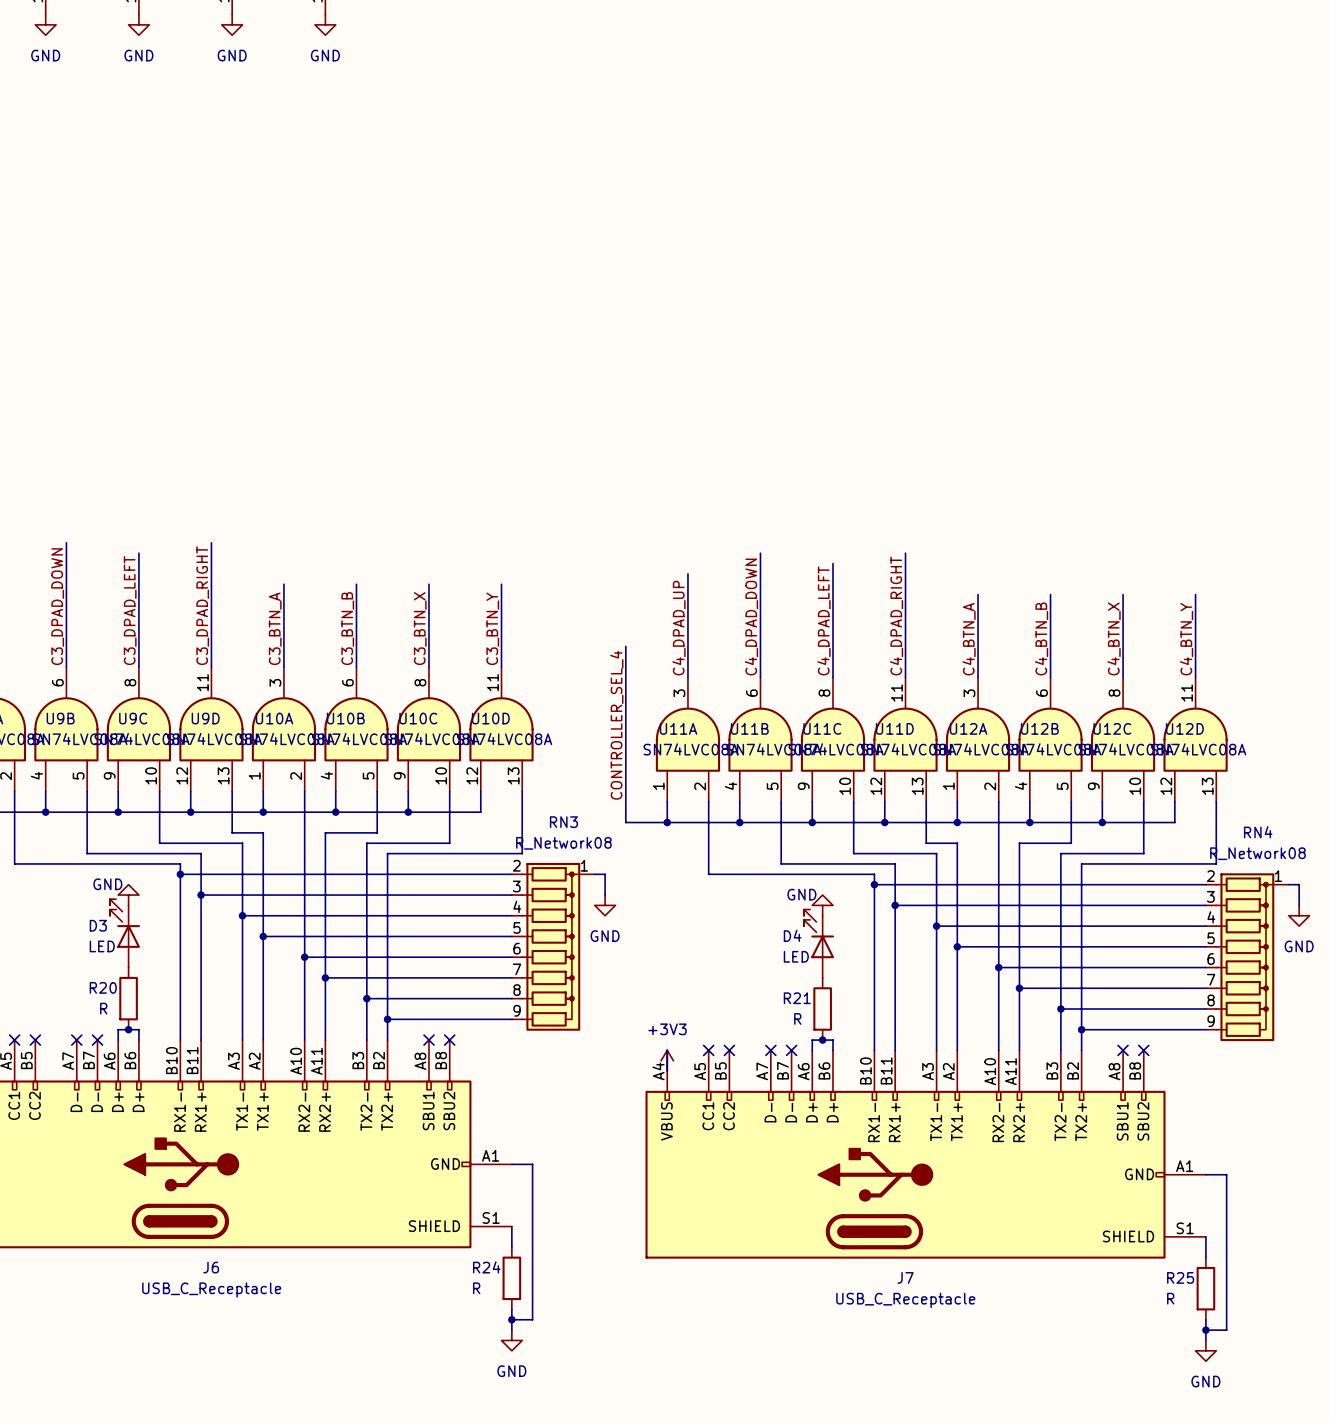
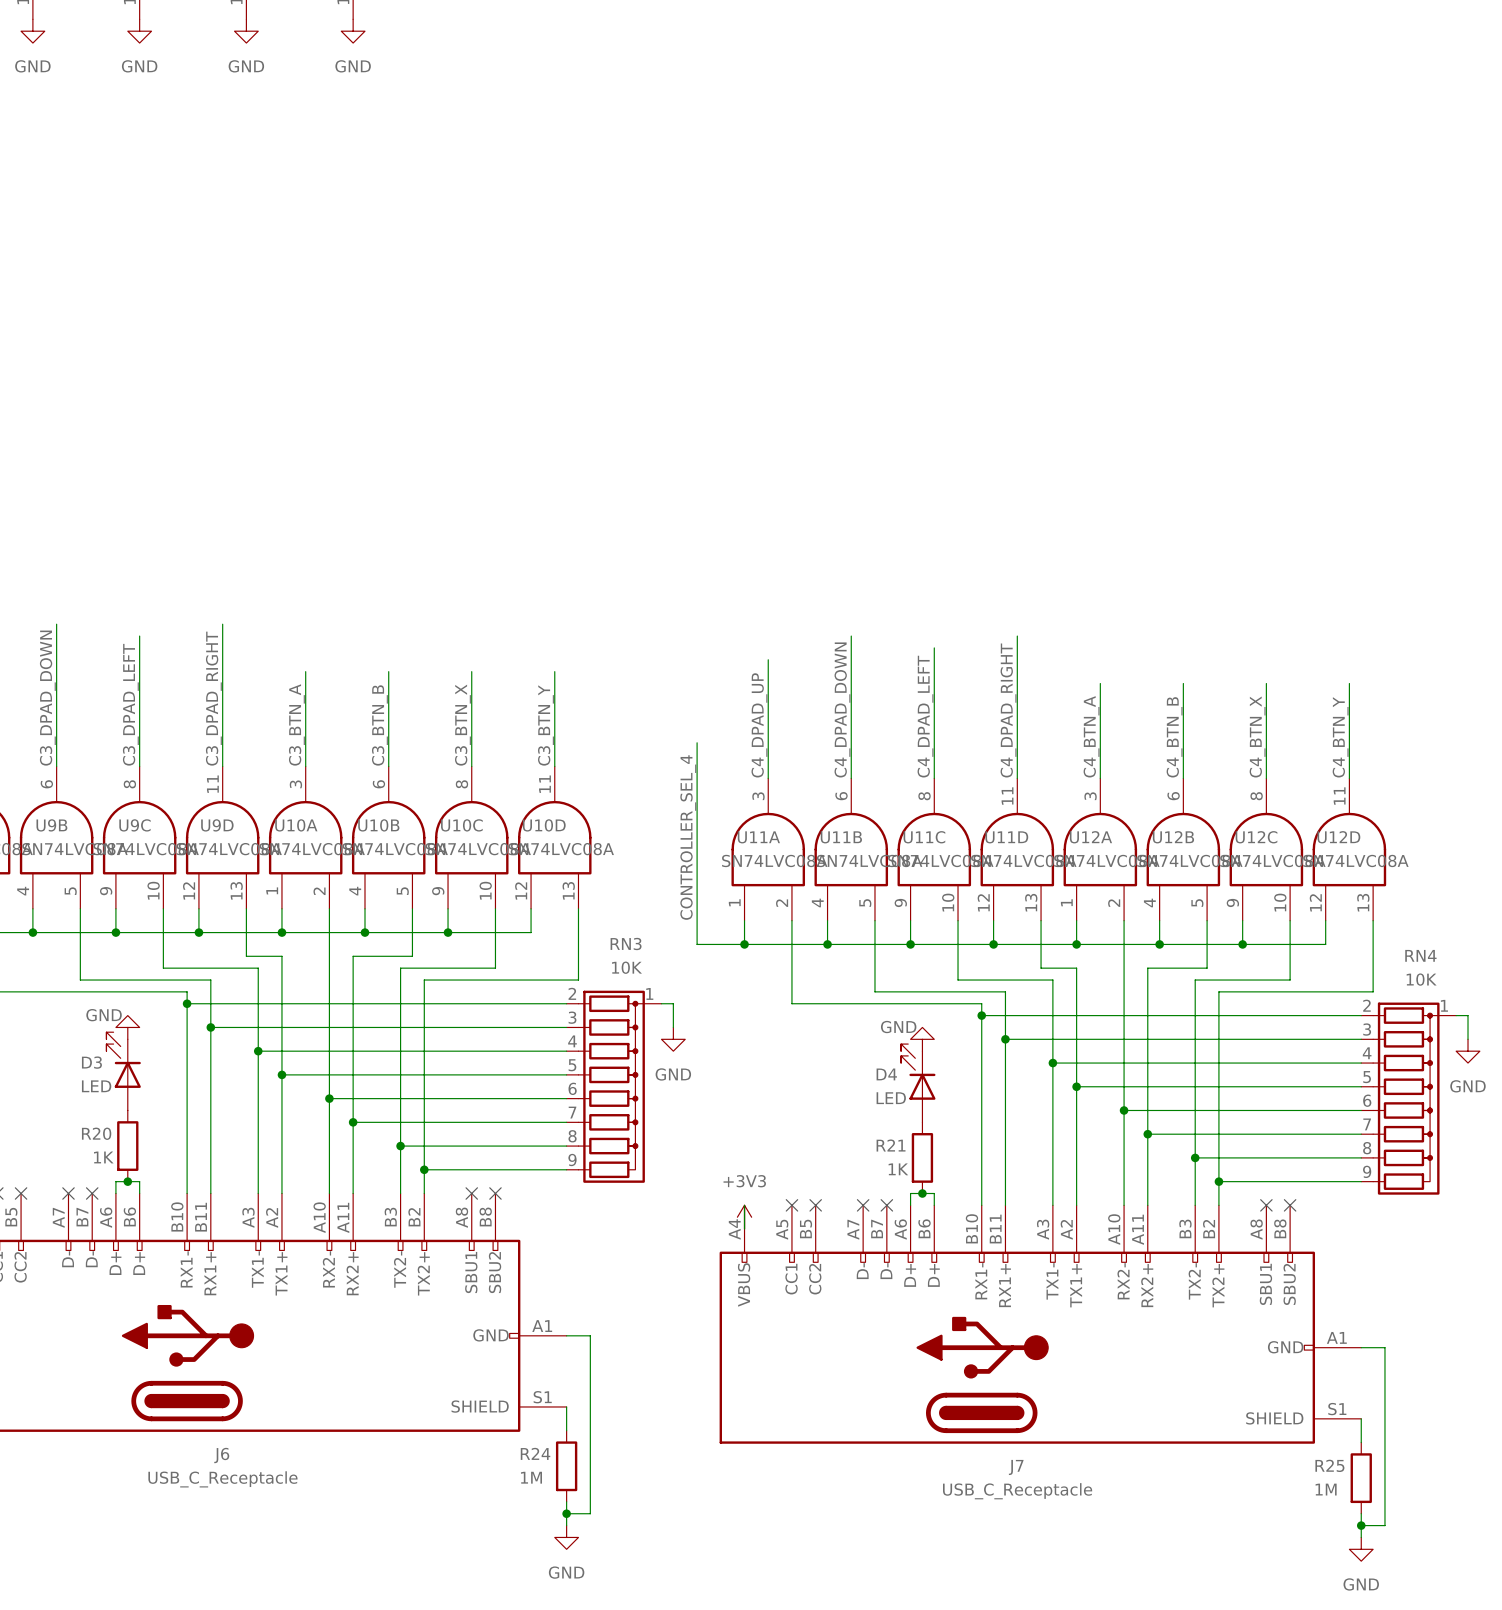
RN3 value: R_Network08 (563, 843) -> 10K (626, 967)
RN4 value: R_Network08 (1257, 853) -> 10K (1421, 979)
R20 value: R (103, 1008) -> 1K (103, 1157)
R21 value: R (797, 1018) -> 1K (898, 1169)
R24 value: R (476, 1288) -> 1M (531, 1477)
R25 value: R (1170, 1298) -> 1M (1326, 1489)

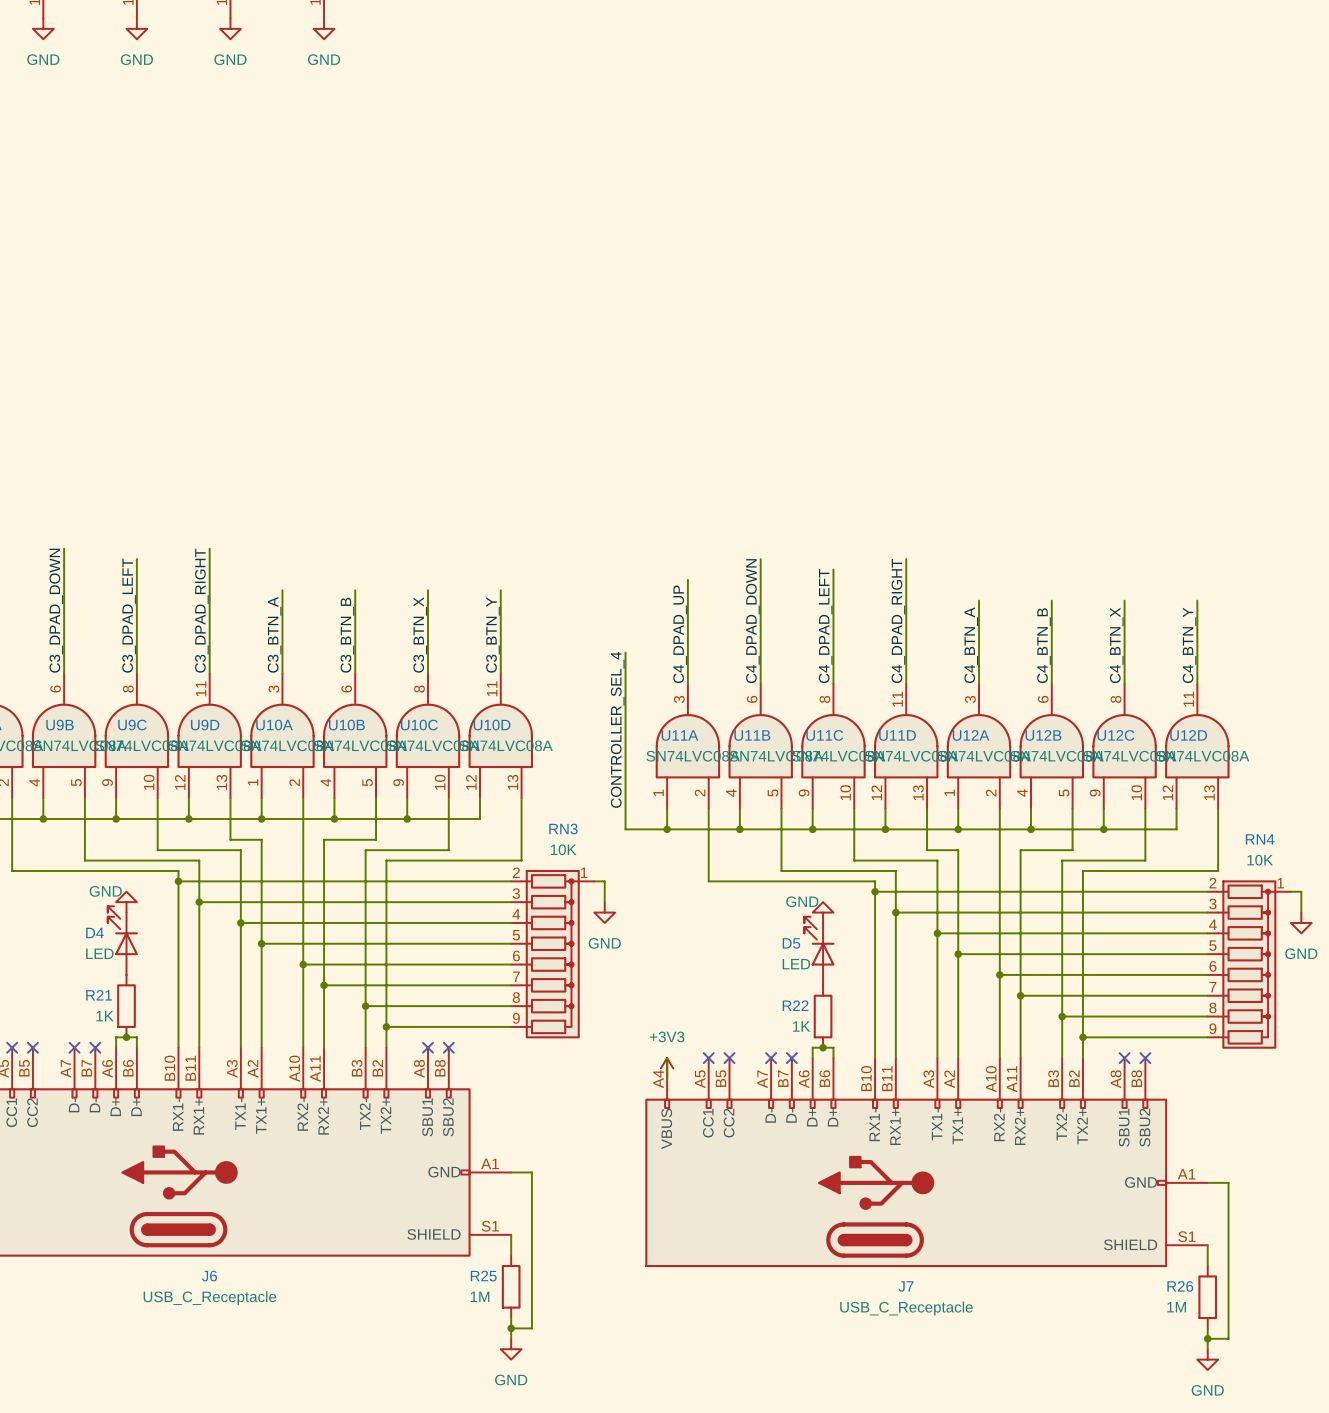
D3 name: D3 (91, 1062) -> D4 (94, 932)
D4 name: D4 (886, 1074) -> D5 (791, 943)
R20 name: R20 (96, 1133) -> R21 (99, 995)
R21 name: R21 (891, 1145) -> R22 (795, 1005)
R24 name: R24 (535, 1453) -> R25 (483, 1276)
R25 name: R25 (1329, 1465) -> R26 (1180, 1286)

